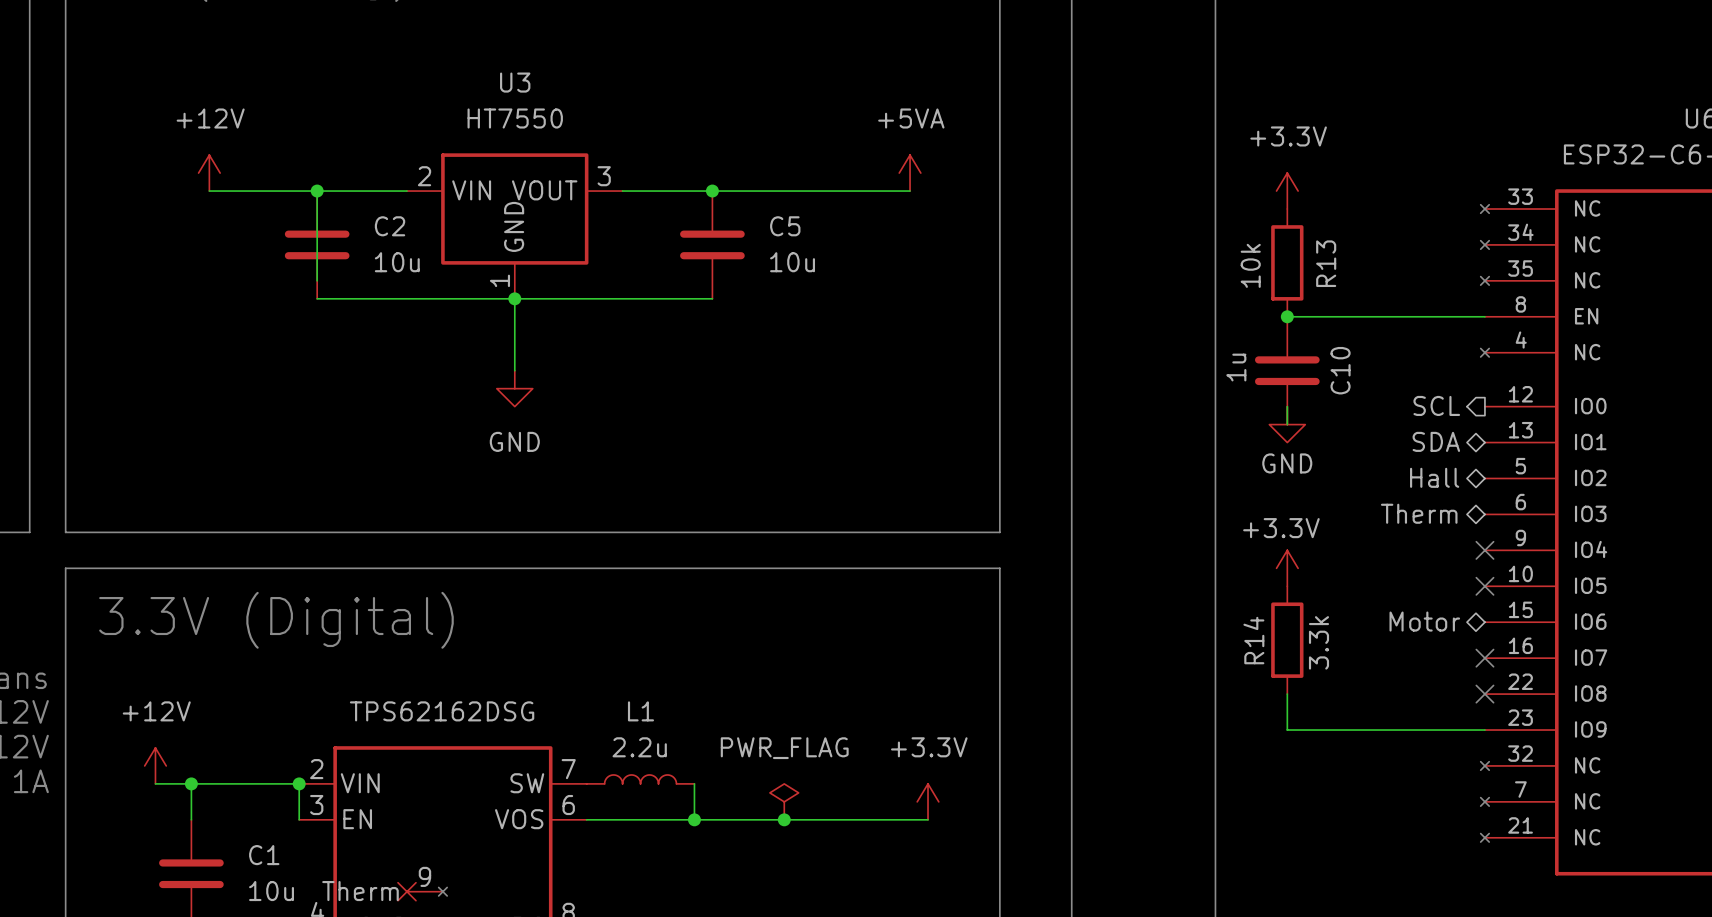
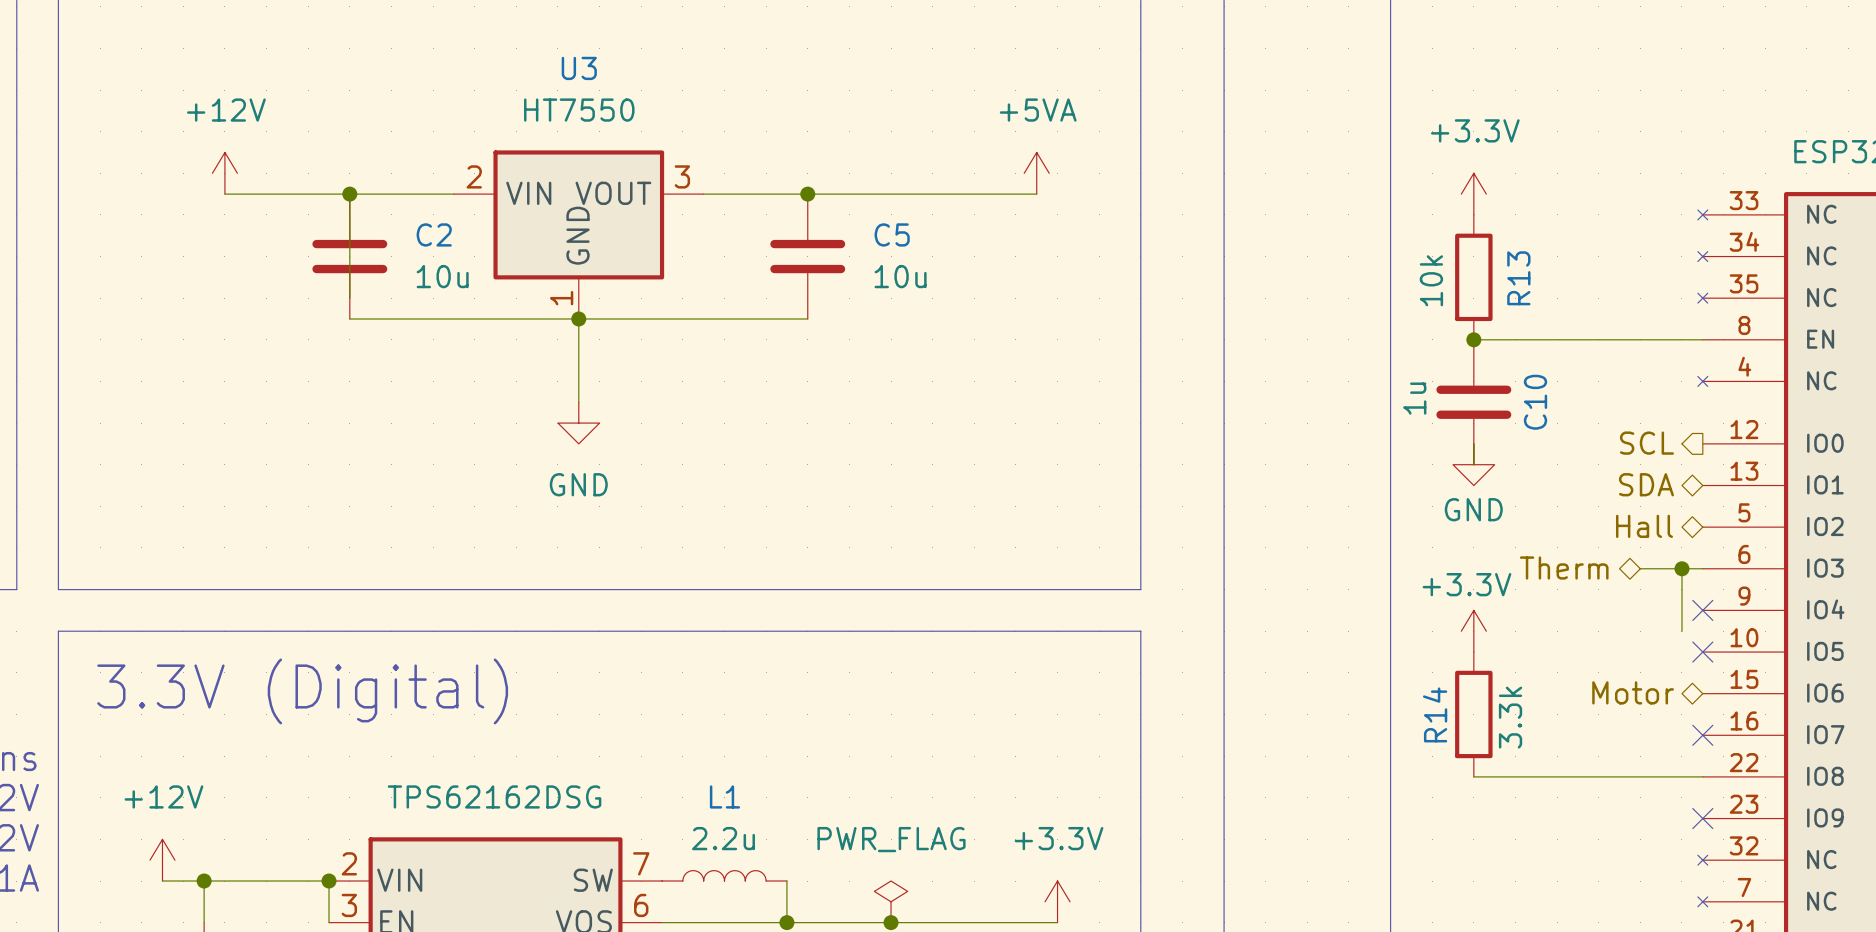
hierarchical label position: Therm (1419, 513) -> Therm (1564, 567)
wire: none -> (1640, 568) (1702, 568)
wire: none -> (1681, 568) (1681, 631)
junction: none -> (1681, 568)
wire: (1287, 694) (1287, 730) (1484, 730) -> (1473, 776) (1702, 776)
no-connect mark position: (1484, 694) -> (1702, 818)

